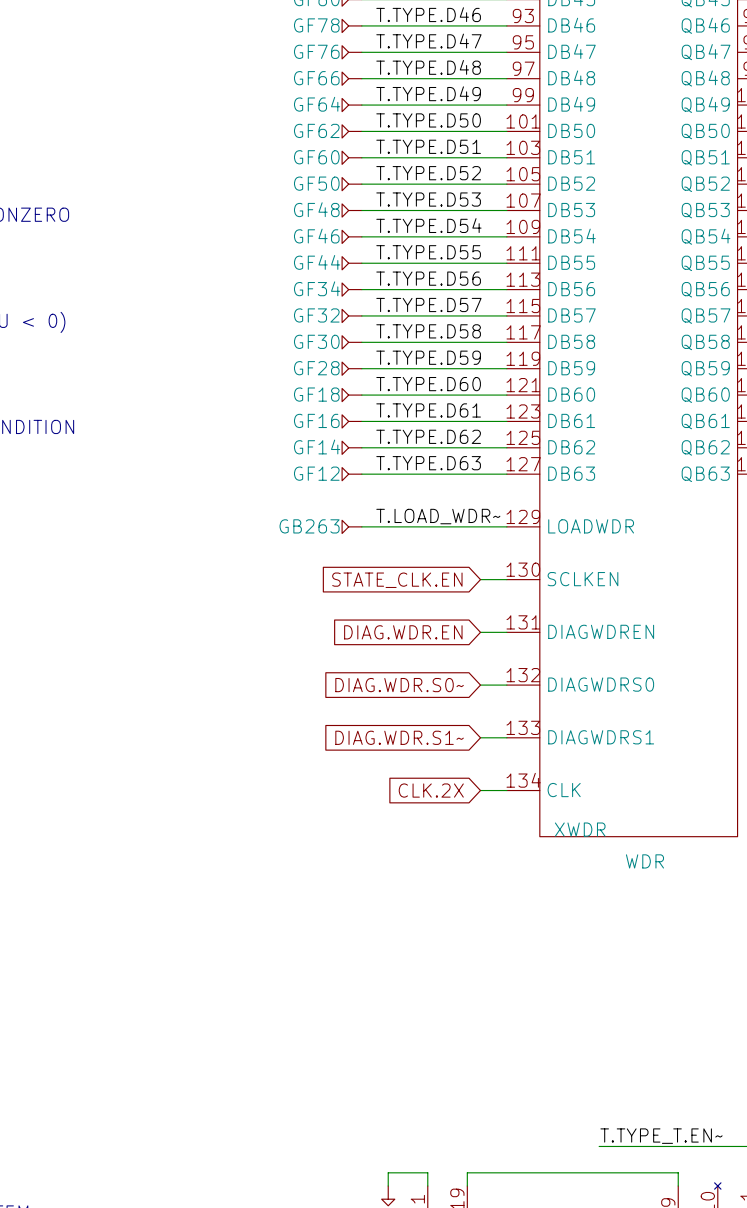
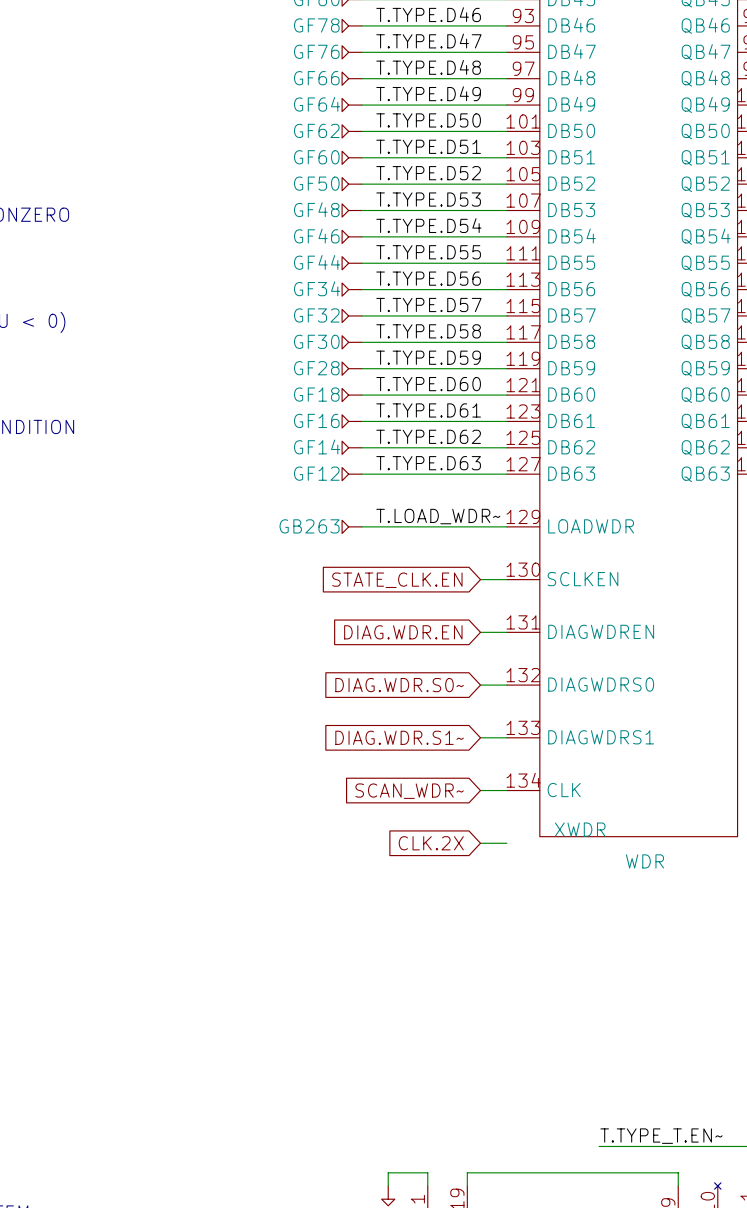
global label: CLK.2X (431, 790) -> SCAN_WDR~ (409, 791)
global label: none -> CLK.2X (431, 843)
wire: none -> (480, 843) (506, 843)

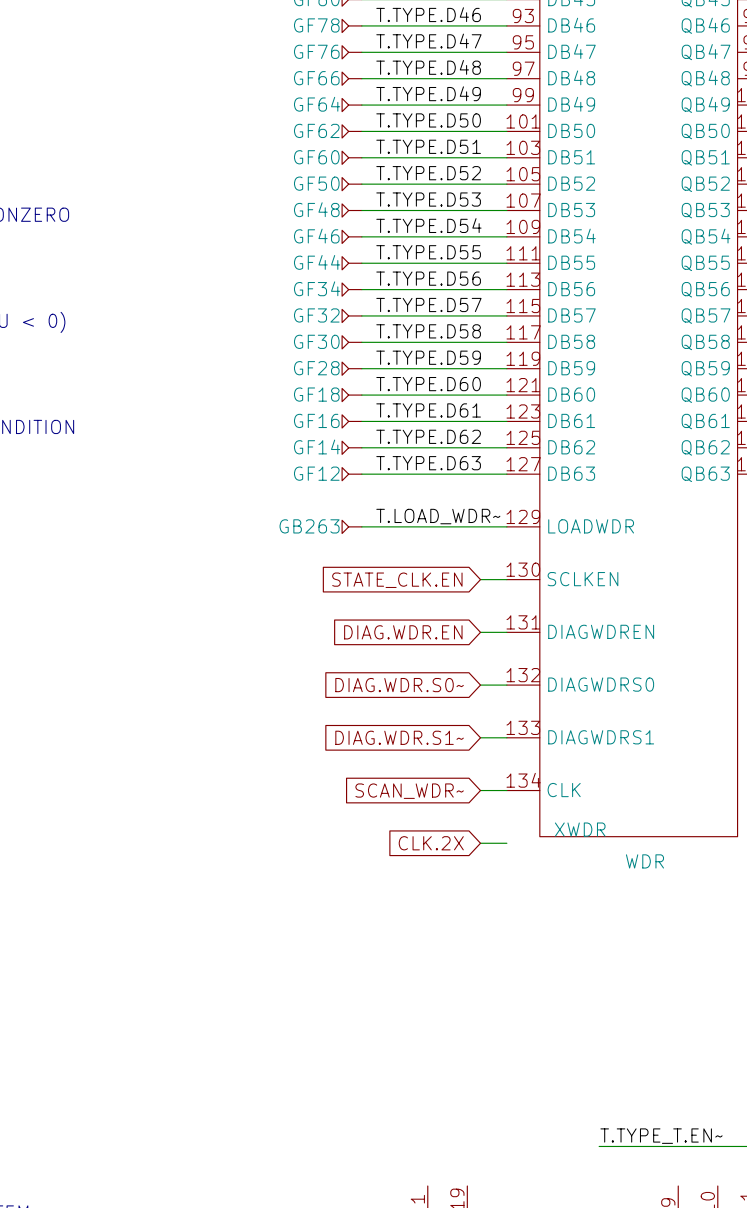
wire: (388, 1186) (388, 1172) (427, 1172) (427, 1186) -> none
wire: (467, 1186) (467, 1172) (678, 1172) (678, 1186) -> none
no-connect mark: (717, 1186) -> none
power symbol: (388, 1196) -> none

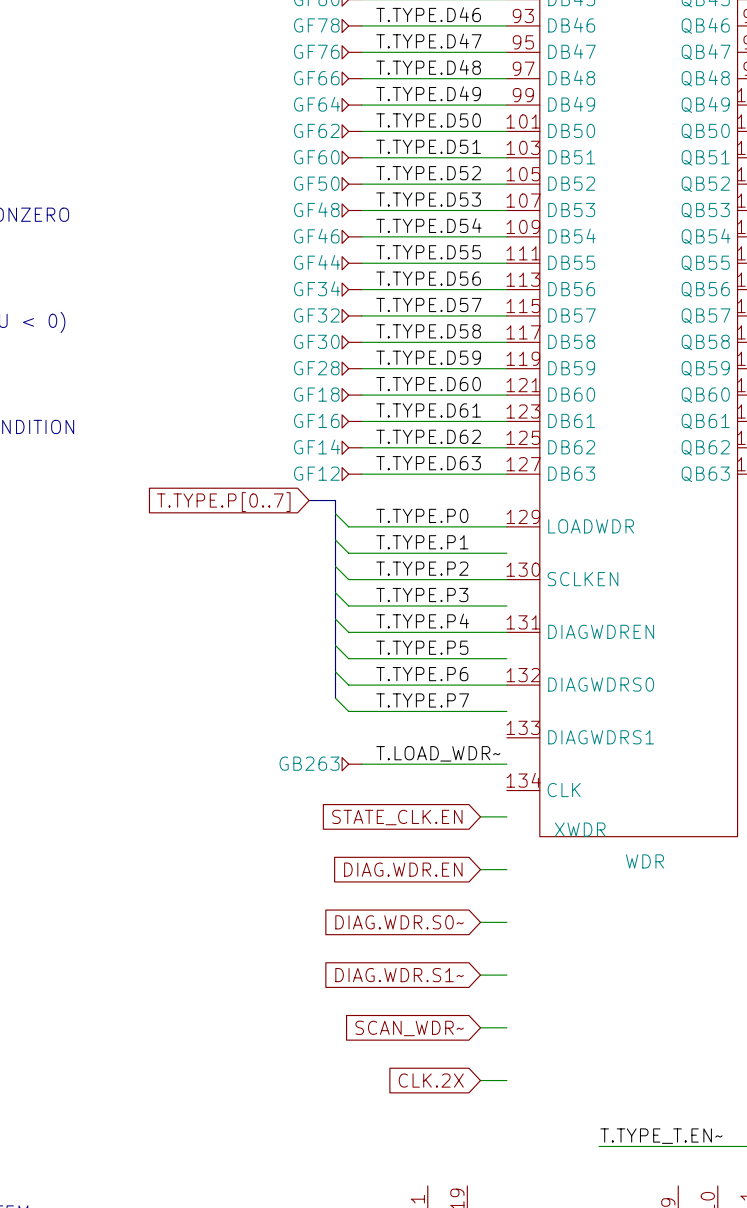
bus: none -> (309, 500) (335, 500) (335, 698)
global label: none -> T.TYPE.P[0..7] (223, 502)
label: T.LOAD_WDR~ (438, 516) -> T.TYPE.P0 (422, 515)
GB263 position: (351, 526) -> (351, 764)
wire: none -> (335, 540) (348, 553) (506, 553)
label: none -> T.TYPE.P1 (422, 542)
wire: none -> (335, 566) (348, 579) (480, 579)
label: none -> T.TYPE.P2 (422, 568)
global label: STATE_CLK.EN (397, 580) -> none
wire: none -> (335, 592) (348, 605) (506, 605)
label: none -> T.TYPE.P3 (422, 595)
wire: none -> (335, 619) (348, 632) (480, 632)
label: none -> T.TYPE.P4 (422, 621)
global label: DIAG.WDR.EN (403, 632) -> none
wire: none -> (335, 645) (348, 658) (506, 658)
label: none -> T.TYPE.P5 (422, 647)
wire: none -> (335, 671) (348, 685) (480, 685)
label: none -> T.TYPE.P6 (422, 674)
global label: DIAG.WDR.S0~ (399, 685) -> none
wire: none -> (335, 698) (348, 711) (506, 711)
label: none -> T.TYPE.P7 (422, 700)
global label: DIAG.WDR.S1~ (399, 737) -> none
wire: (480, 737) (506, 737) -> (480, 816) (506, 816)
label: none -> T.LOAD_WDR~ (438, 753)
wire: none -> (361, 764) (506, 764)
wire: (480, 790) (506, 790) -> (480, 869) (506, 869)
global label: SCAN_WDR~ (409, 791) -> none
global label: none -> STATE_CLK.EN (397, 817)
global label: CLK.2X (431, 843) -> none
wire: (480, 843) (506, 843) -> (480, 922) (506, 922)
global label: none -> DIAG.WDR.EN (403, 869)
global label: none -> DIAG.WDR.S0~ (399, 922)
global label: none -> DIAG.WDR.S1~ (399, 975)
wire: none -> (480, 975) (506, 975)
wire: none -> (480, 1027) (506, 1027)
global label: none -> SCAN_WDR~ (409, 1028)
global label: none -> CLK.2X (431, 1080)
wire: none -> (480, 1080) (506, 1080)

